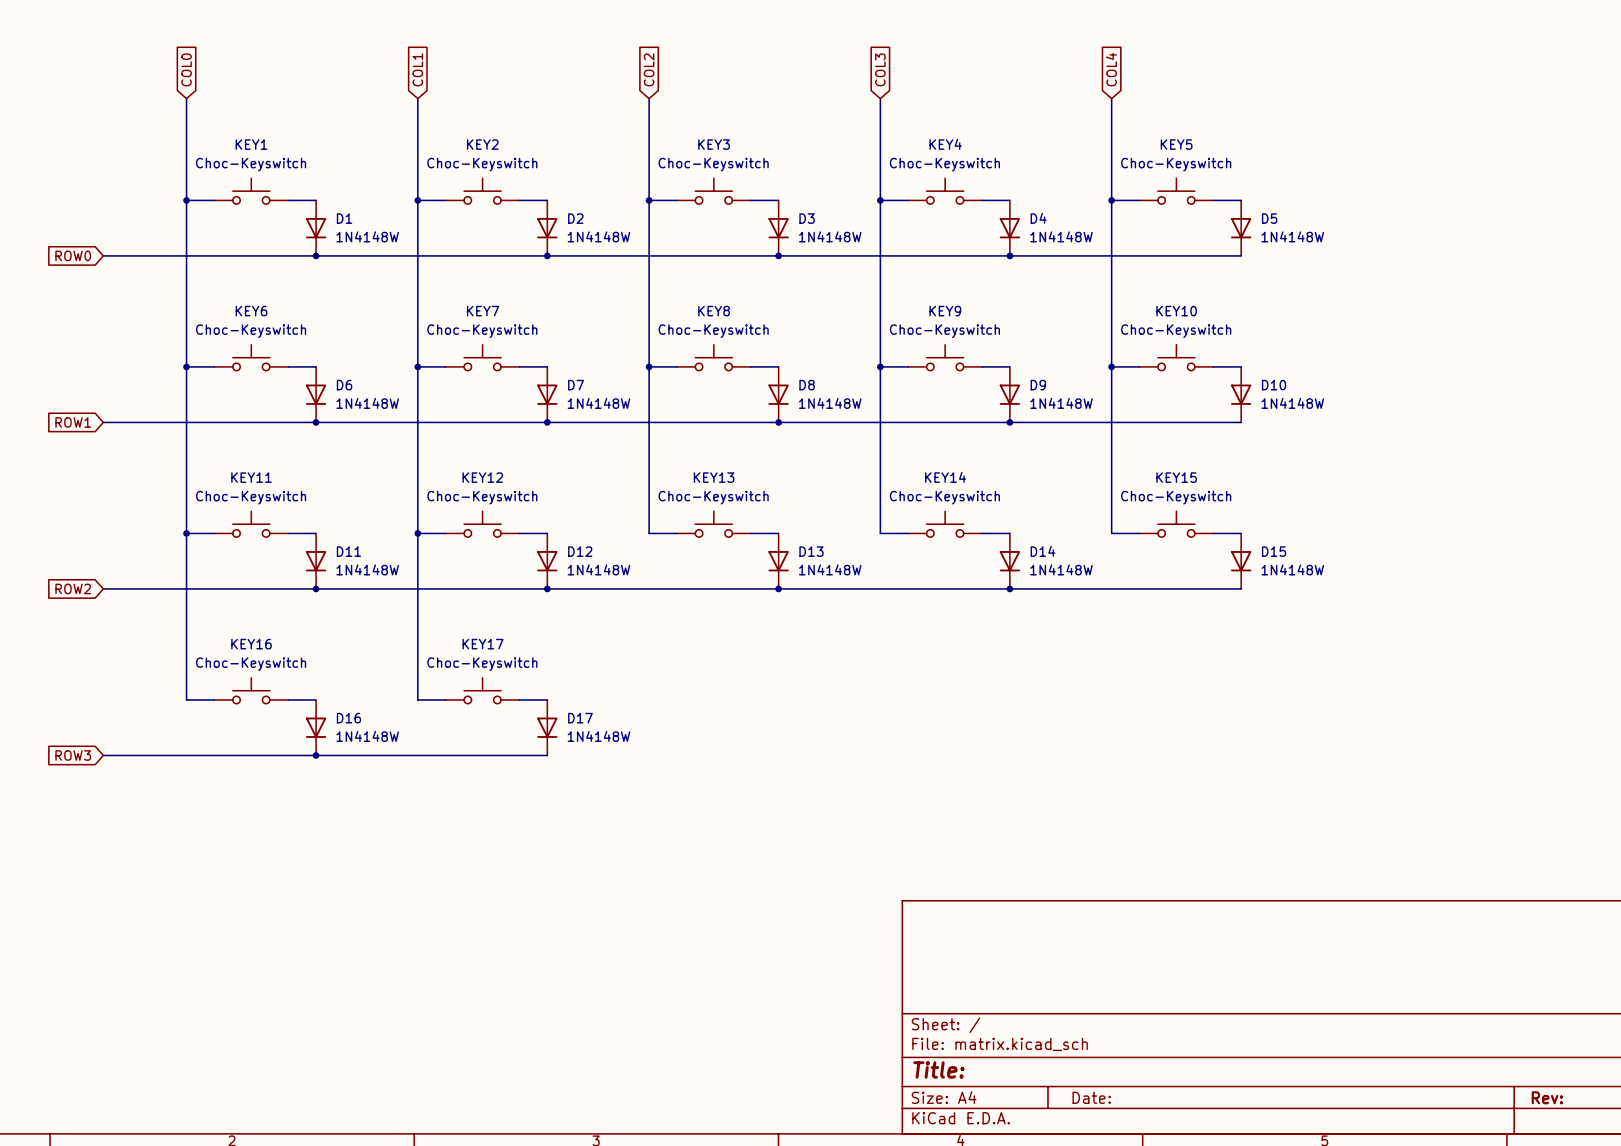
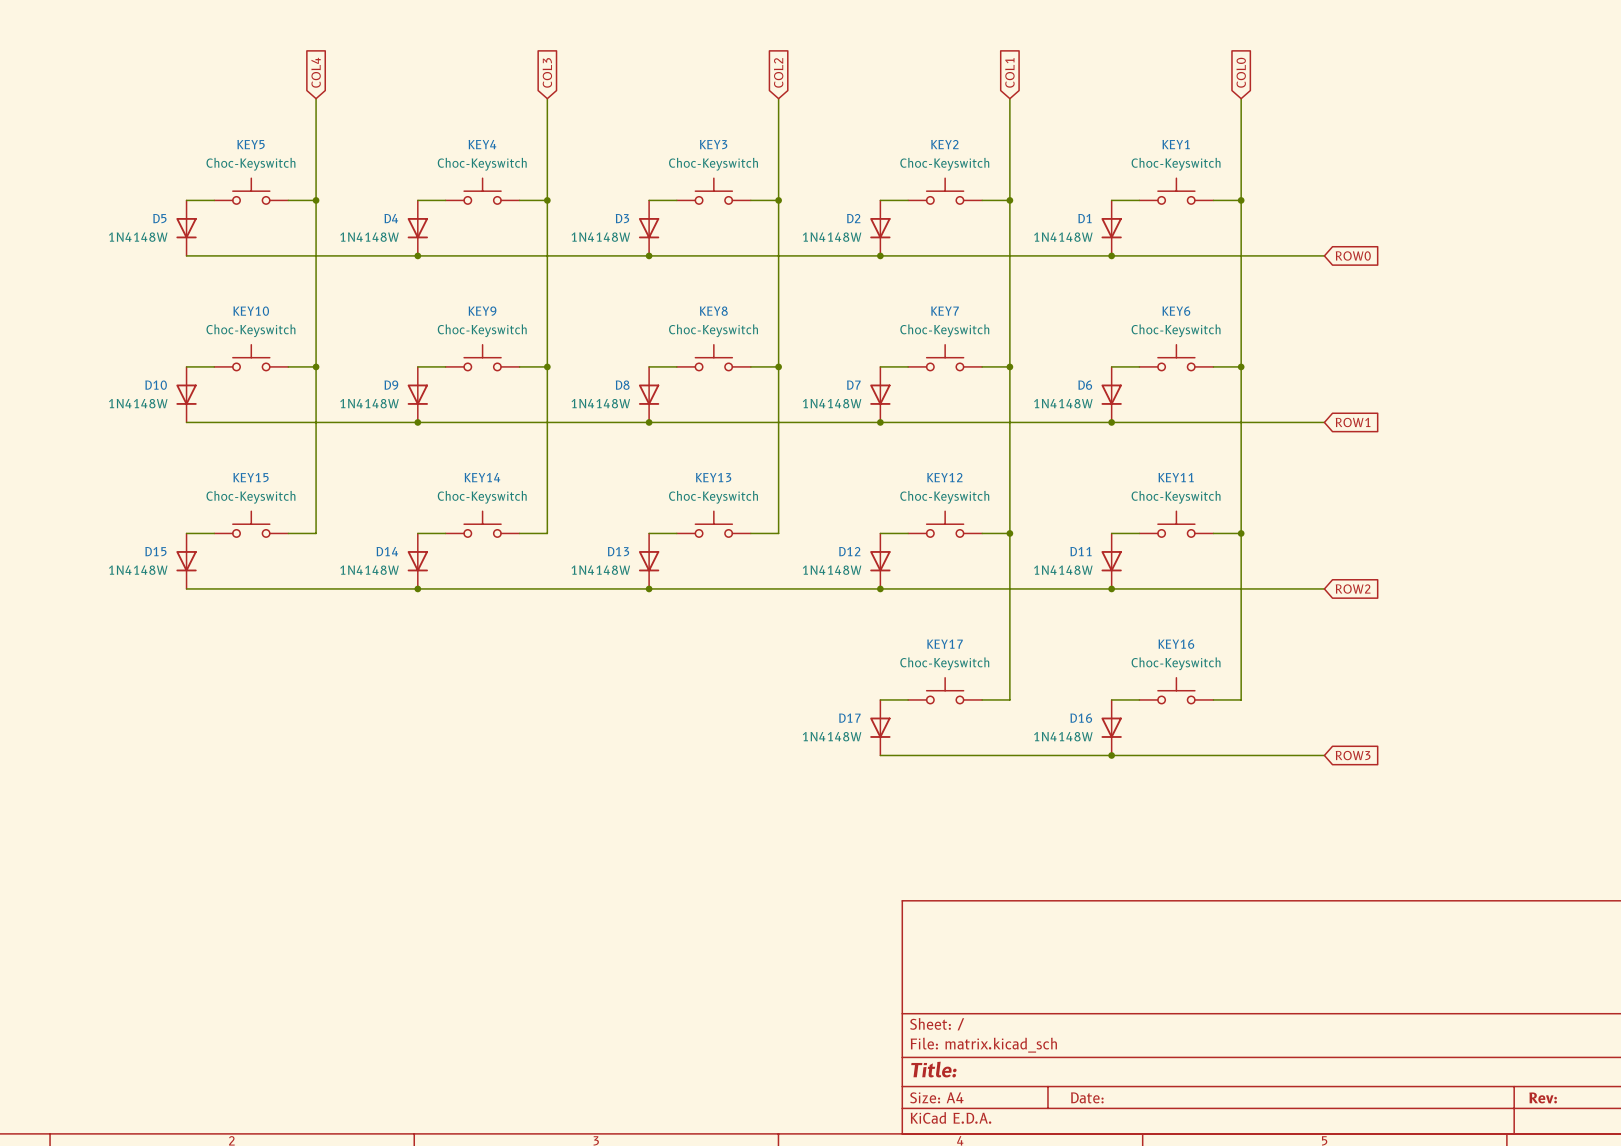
global label: COL0 (186, 69) -> none
global label: none -> COL4 (316, 72)
global label: COL1 (417, 69) -> none
global label: none -> COL3 (547, 72)
global label position: COL2 (649, 69) -> COL2 (778, 72)
global label: COL3 (880, 69) -> none
global label: none -> COL1 (1009, 72)
global label: COL4 (1111, 69) -> none
global label: none -> COL0 (1241, 72)
wire: (186, 98) (186, 699) (214, 699) -> none
wire: none -> (316, 98) (316, 533)
wire: (417, 98) (417, 699) (445, 699) -> none
wire: (649, 98) (649, 533) -> (547, 98) (547, 533)
wire: (880, 98) (880, 533) -> (778, 98) (778, 533)
wire: none -> (1009, 98) (1009, 699) (982, 699)
wire: (1111, 98) (1111, 533) -> none
wire: none -> (1241, 98) (1241, 699) (1213, 699)
KEY1 name: KEY1 (251, 144) -> KEY5 (251, 144)
KEY2 name: KEY2 (482, 144) -> KEY4 (482, 144)
KEY4 name: KEY4 (945, 144) -> KEY2 (944, 144)
KEY5 name: KEY5 (1176, 144) -> KEY1 (1176, 144)
junction: (186, 200) -> none
junction: none -> (316, 200)
junction: (417, 200) -> none
junction: none -> (547, 200)
junction: (649, 200) -> none
junction: none -> (778, 200)
junction: (880, 200) -> none
junction: none -> (1009, 200)
junction: (1111, 200) -> none
junction: none -> (1241, 200)
D1 name position: D1 (344, 218) -> D1 (1084, 218)
D2 name position: D2 (575, 218) -> D2 (853, 218)
D3 name position: D3 (807, 218) -> D3 (622, 218)
D4 name position: D4 (1038, 218) -> D4 (391, 218)
D5 name position: D5 (1269, 218) -> D5 (159, 218)
D1 position: (316, 228) -> (1111, 228)
D2 position: (547, 228) -> (880, 228)
D3 position: (778, 228) -> (649, 228)
D4 position: (1009, 228) -> (417, 228)
D5 position: (1241, 228) -> (186, 228)
D1 value position: 1N4148W (367, 236) -> 1N4148W (1063, 237)
D2 value position: 1N4148W (598, 236) -> 1N4148W (832, 237)
D3 value position: 1N4148W (830, 236) -> 1N4148W (600, 237)
D4 value position: 1N4148W (1061, 236) -> 1N4148W (369, 237)
D5 value position: 1N4148W (1292, 236) -> 1N4148W (138, 237)
global label: ROW0 (73, 255) -> none
wire: (103, 255) (186, 255) -> none
junction: (316, 255) -> none
junction: none -> (417, 255)
junction: (547, 255) -> none
junction: none -> (649, 255)
junction: (778, 255) -> none
junction: none -> (880, 255)
junction: (1009, 255) -> none
junction: none -> (1111, 255)
wire: none -> (1241, 255) (1324, 255)
global label: none -> ROW0 (1353, 255)
KEY6 name: KEY6 (251, 311) -> KEY10 (251, 311)
KEY7 name: KEY7 (483, 311) -> KEY9 (482, 311)
KEY9 name: KEY9 (945, 311) -> KEY7 (945, 311)
KEY10 name: KEY10 (1176, 311) -> KEY6 (1176, 311)
junction: (186, 366) -> none
junction: none -> (316, 366)
junction: (417, 366) -> none
junction: none -> (547, 366)
junction: (649, 366) -> none
junction: none -> (778, 366)
junction: (880, 366) -> none
junction: none -> (1009, 366)
junction: (1111, 366) -> none
junction: none -> (1241, 366)
D6 name position: D6 (344, 385) -> D6 (1085, 385)
D7 name position: D7 (576, 385) -> D7 (853, 385)
D8 name position: D8 (807, 385) -> D8 (622, 385)
D9 name position: D9 (1038, 385) -> D9 (391, 385)
D10 name position: D10 (1274, 385) -> D10 (156, 385)
D6 position: (316, 394) -> (1111, 394)
D7 position: (547, 394) -> (880, 394)
D8 position: (778, 394) -> (649, 394)
D9 position: (1009, 394) -> (417, 394)
D10 position: (1241, 394) -> (186, 394)
D6 value position: 1N4148W (367, 403) -> 1N4148W (1063, 403)
D7 value position: 1N4148W (598, 403) -> 1N4148W (832, 403)
D8 value position: 1N4148W (830, 403) -> 1N4148W (600, 403)
D9 value position: 1N4148W (1061, 403) -> 1N4148W (369, 403)
D10 value position: 1N4148W (1292, 403) -> 1N4148W (138, 403)
global label: ROW1 (73, 422) -> none
wire: (103, 422) (186, 422) -> none
junction: (316, 422) -> none
junction: none -> (417, 422)
junction: (547, 422) -> none
junction: none -> (649, 422)
junction: (778, 422) -> none
junction: none -> (880, 422)
junction: (1009, 422) -> none
junction: none -> (1111, 422)
wire: none -> (1241, 422) (1324, 422)
global label: none -> ROW1 (1353, 422)
KEY11 name: KEY11 (251, 477) -> KEY15 (251, 477)
KEY12 name: KEY12 (482, 477) -> KEY14 (482, 477)
KEY14 name: KEY14 (945, 477) -> KEY12 (944, 477)
KEY15 name: KEY15 (1176, 477) -> KEY11 (1176, 477)
junction: (186, 533) -> none
junction: (417, 533) -> none
junction: none -> (1009, 533)
junction: none -> (1241, 533)
D11 name position: D11 (348, 551) -> D11 (1081, 551)
D12 name position: D12 (580, 551) -> D12 (849, 551)
D13 name position: D13 (811, 551) -> D13 (618, 551)
D14 name position: D14 (1042, 551) -> D14 (387, 551)
D15 name position: D15 (1274, 551) -> D15 (155, 551)
D11 position: (316, 561) -> (1111, 561)
D12 position: (547, 561) -> (880, 561)
D13 position: (778, 561) -> (649, 561)
D14 position: (1009, 561) -> (417, 561)
D15 position: (1241, 561) -> (186, 561)
D11 value position: 1N4148W (367, 569) -> 1N4148W (1063, 570)
D12 value position: 1N4148W (598, 569) -> 1N4148W (832, 570)
D13 value position: 1N4148W (830, 569) -> 1N4148W (600, 570)
D14 value position: 1N4148W (1061, 569) -> 1N4148W (369, 570)
D15 value position: 1N4148W (1292, 569) -> 1N4148W (138, 570)
global label: ROW2 (73, 588) -> none
wire: (103, 588) (186, 588) -> none
junction: (316, 588) -> none
junction: none -> (417, 588)
junction: (547, 588) -> none
junction: none -> (649, 588)
junction: (778, 588) -> none
junction: none -> (880, 588)
junction: (1009, 588) -> none
junction: none -> (1111, 588)
wire: none -> (1241, 588) (1324, 588)
global label: none -> ROW2 (1353, 589)
KEY16 position: (251, 690) -> (1176, 690)
KEY17 position: (482, 690) -> (945, 690)
wire: (288, 699) (316, 699) -> none
wire: (519, 699) (547, 699) -> none
wire: none -> (880, 699) (908, 699)
wire: none -> (1111, 699) (1139, 699)
D16 name position: D16 (348, 718) -> D16 (1081, 718)
D17 name position: D17 (580, 718) -> D17 (849, 718)
D16 position: (316, 727) -> (1111, 727)
D17 position: (547, 727) -> (880, 727)
D16 value position: 1N4148W (367, 736) -> 1N4148W (1063, 736)
D17 value position: 1N4148W (598, 736) -> 1N4148W (832, 736)
global label: ROW3 (73, 755) -> none
wire: (103, 755) (547, 755) -> none
junction: (316, 755) -> none
wire: none -> (880, 755) (1324, 755)
junction: none -> (1111, 755)
global label: none -> ROW3 (1353, 755)

